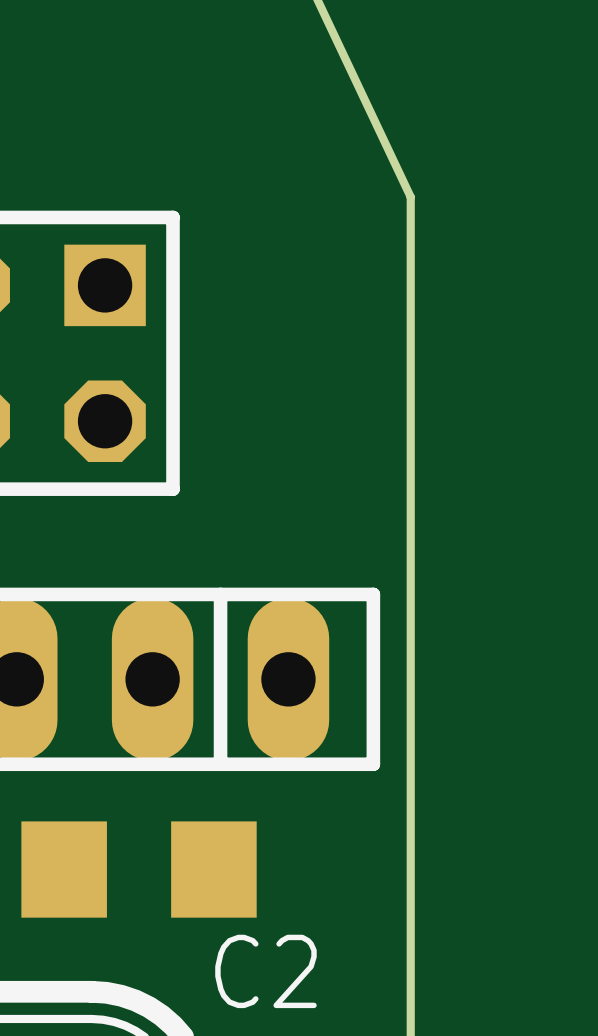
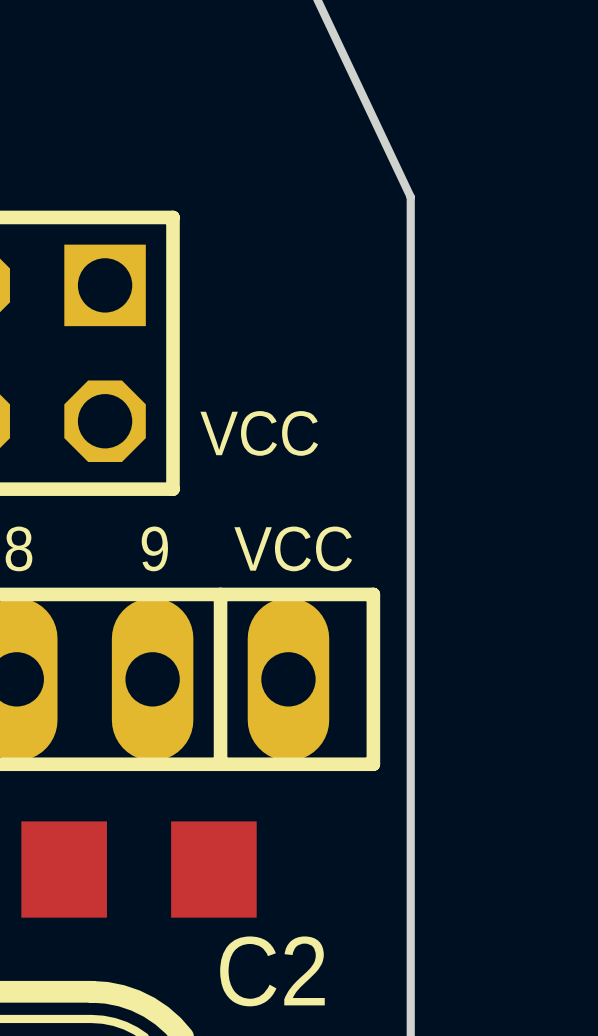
text: none -> VCC (259, 433)
text: none -> 8 (19, 548)
text: none -> 9 (154, 548)
text: none -> VCC (293, 548)

